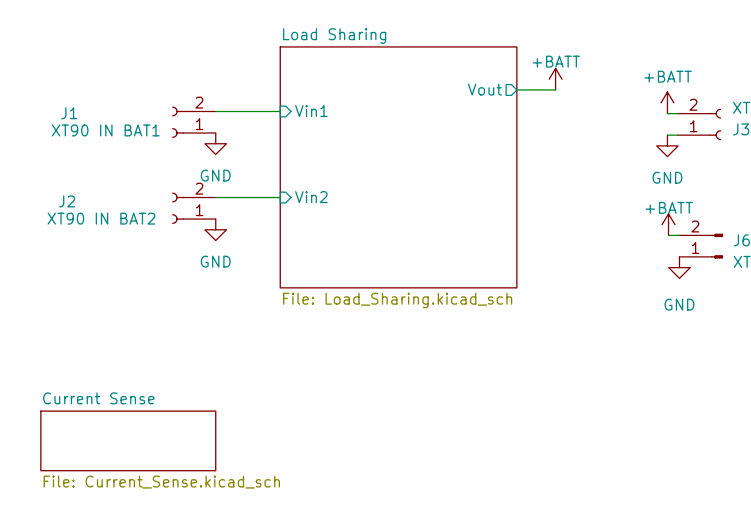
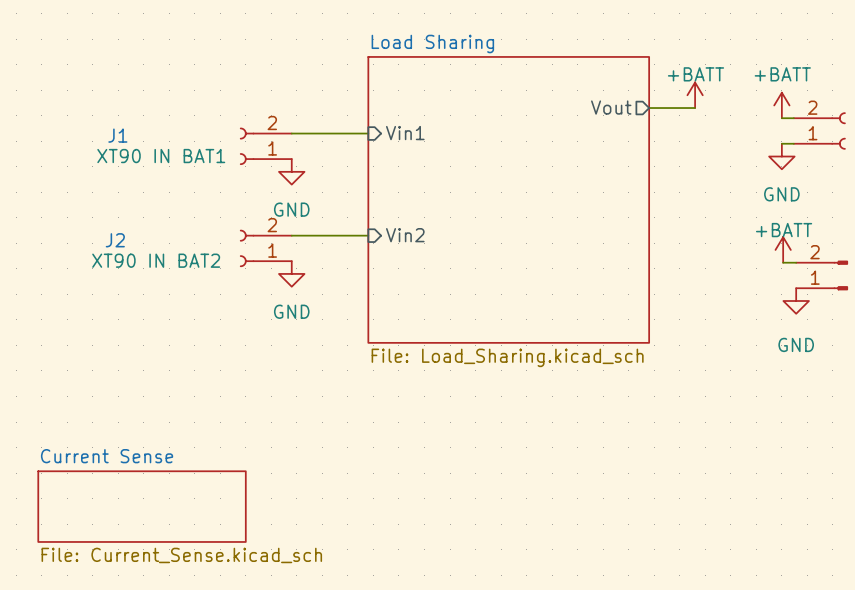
power symbol position: +BATT (555, 79) -> +BATT (695, 95)
sheet pin position: Vout (484, 89) -> Vout (611, 107)
wire: (516, 89) (555, 89) -> (649, 108) (695, 108)
wire: (215, 111) (280, 111) -> (291, 133) (368, 133)
sheet pin position: Vin1 (311, 111) -> Vin1 (405, 133)
J1 position: (193, 122) -> (265, 146)
power symbol: GND (215, 143) -> none
power symbol: none -> GND (291, 171)
sheet Load Sharing position: (398, 167) -> (508, 199)
wire: (215, 197) (280, 197) -> (291, 235) (368, 235)
sheet pin position: Vin2 (311, 197) -> Vin2 (405, 235)
J2 position: (193, 208) -> (265, 248)
power symbol: GND (215, 229) -> none
power symbol: none -> GND (291, 273)

